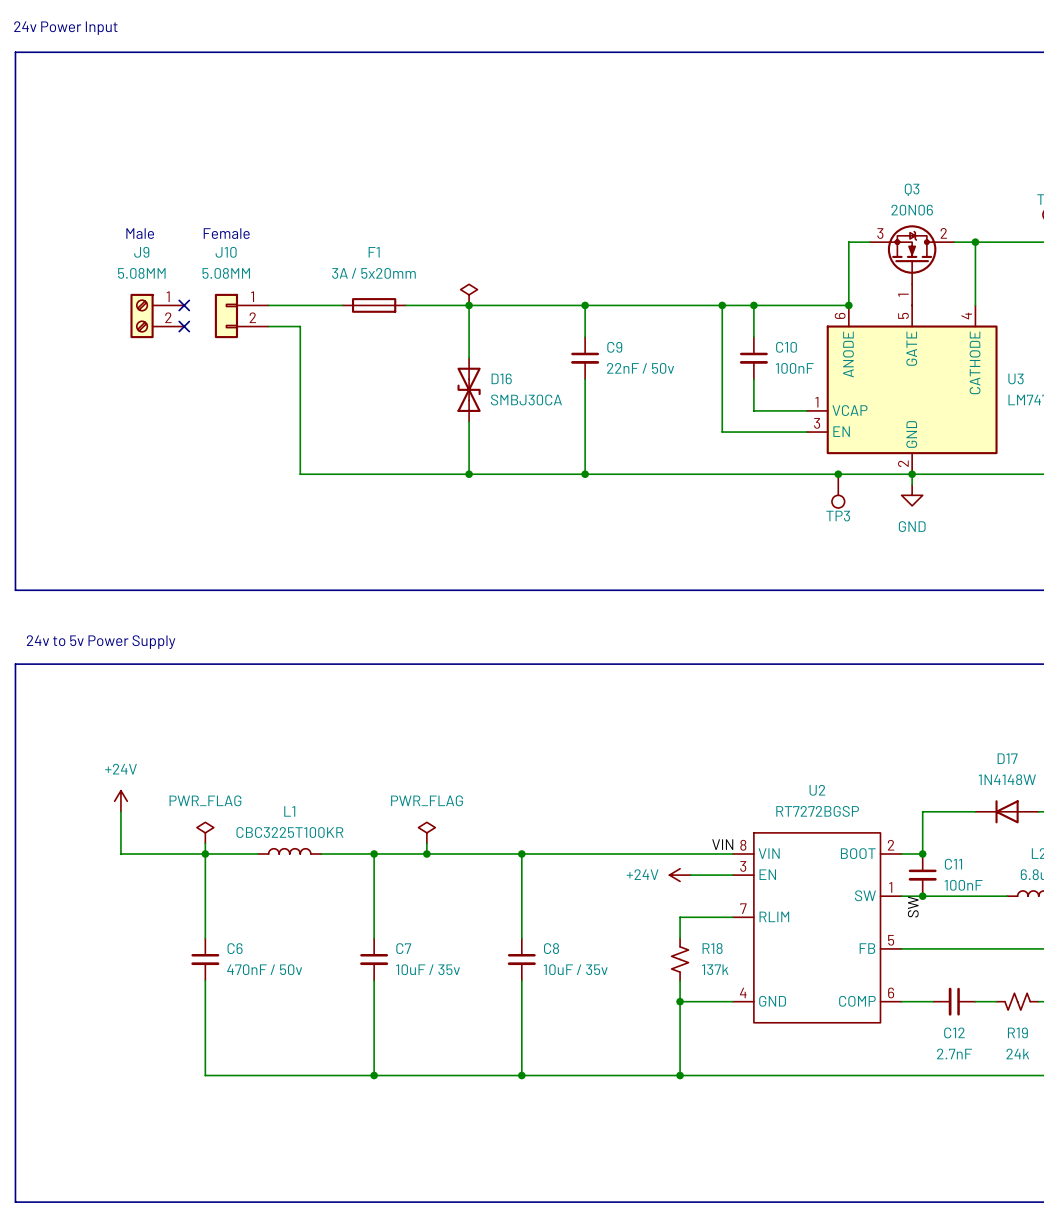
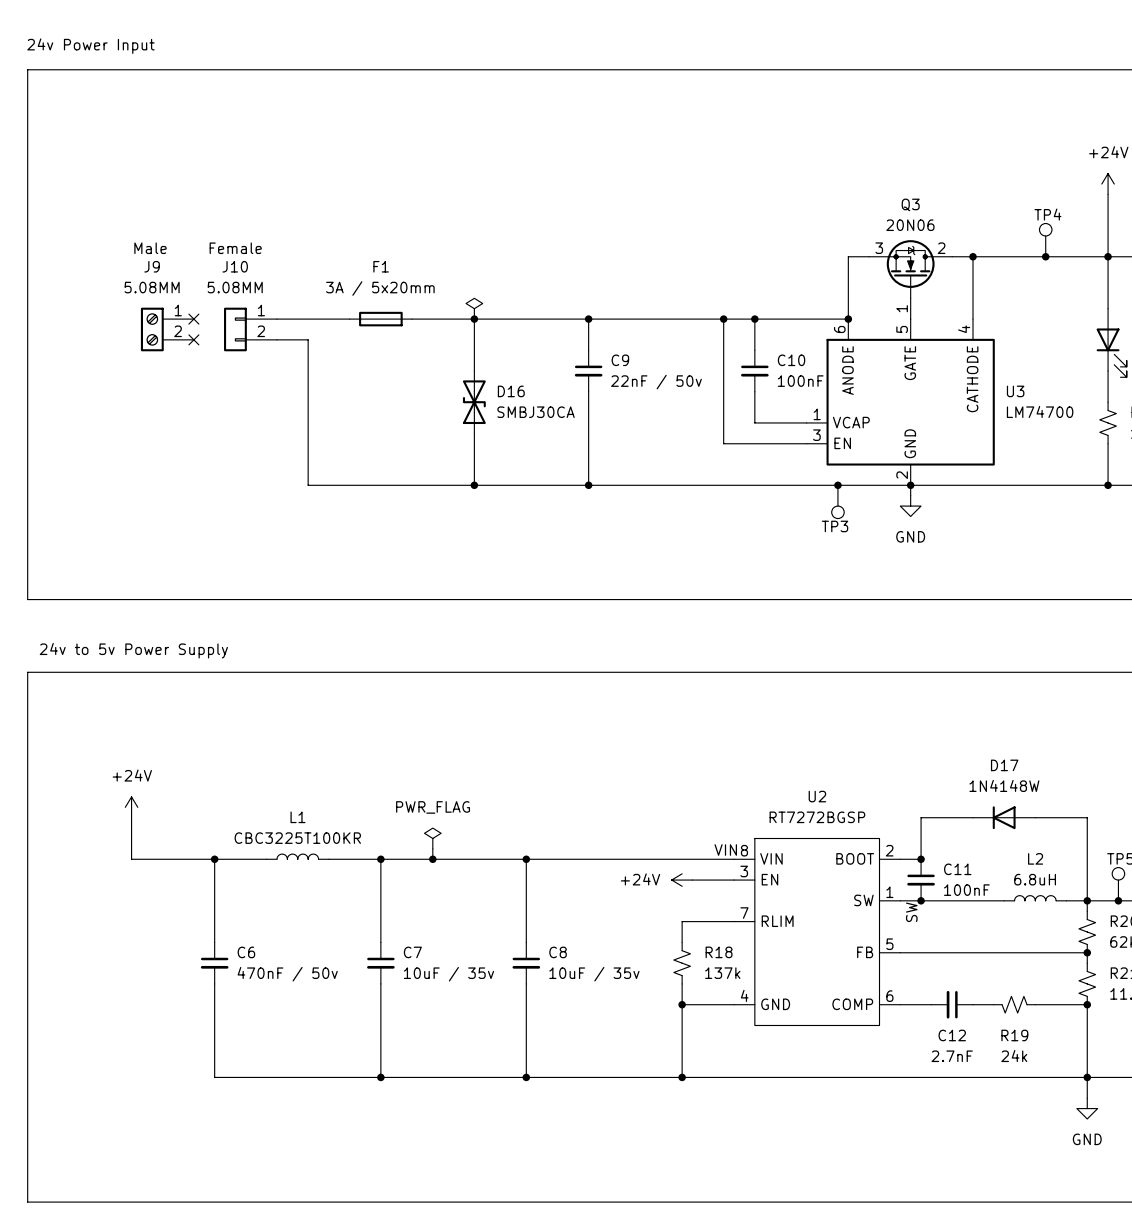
power symbol: PWR_FLAG (205, 832) -> none
wire: (205, 843) (205, 853) -> none

